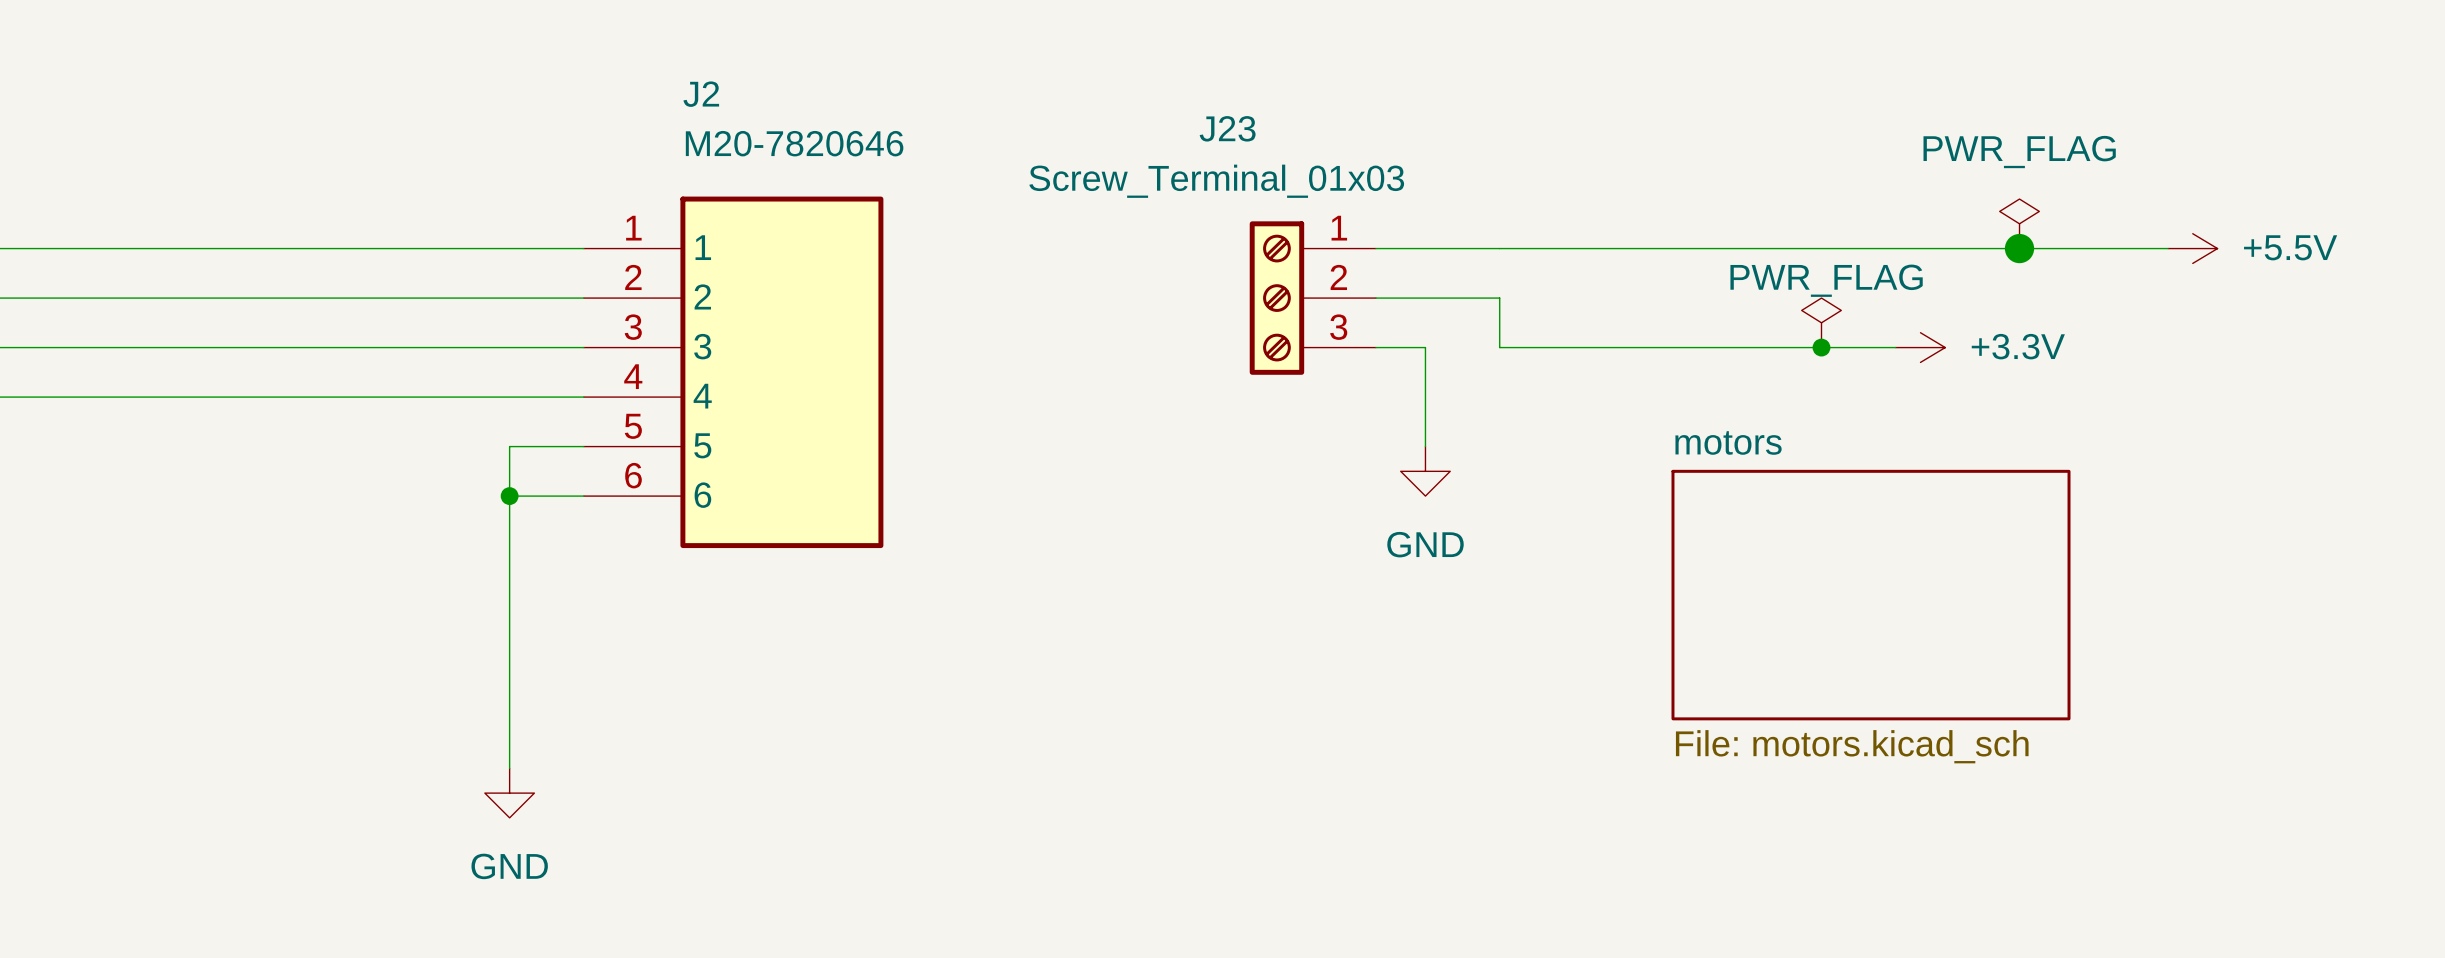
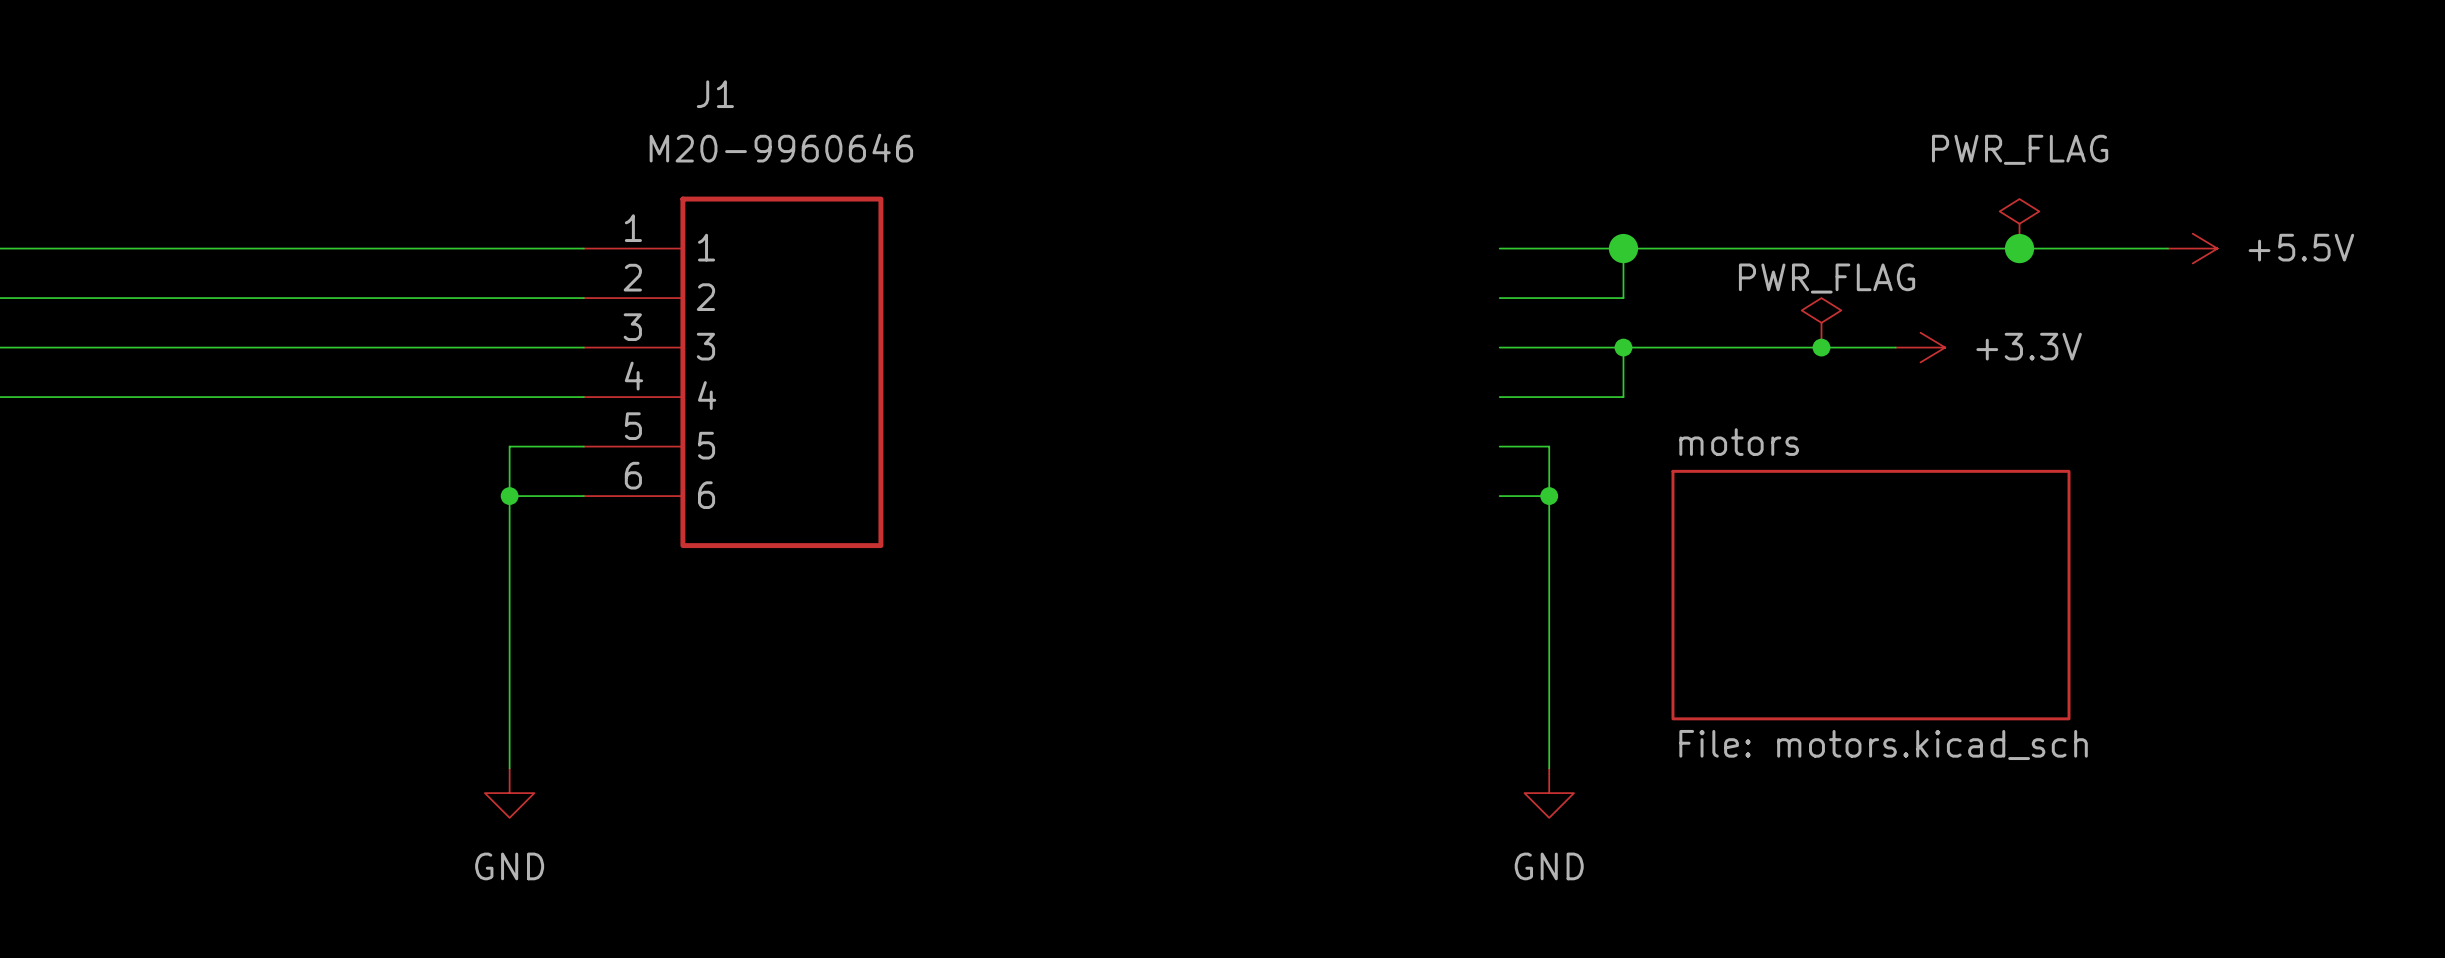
J2 name: J2 (701, 94) -> J1 (715, 94)
J2 value: M20-7820646 (794, 143) -> M20-9960646 (781, 148)
wire: (1375, 248) (1499, 248) -> none
wire: none -> (1623, 248) (1623, 298) (1499, 298)
junction: none -> (1623, 248)
J23: Screw_Terminal_01x03 (1312, 298) -> none
wire: (1375, 298) (1499, 298) (1499, 347) -> none
wire: (1375, 347) (1425, 347) (1425, 446) -> none
wire: none -> (1623, 347) (1623, 397) (1499, 397)
junction: none -> (1623, 347)
wire: none -> (1499, 446) (1549, 446) (1549, 768)
power symbol position: GND (1425, 471) -> GND (1549, 793)
wire: none -> (1499, 496) (1549, 496)
junction: none -> (1549, 496)

